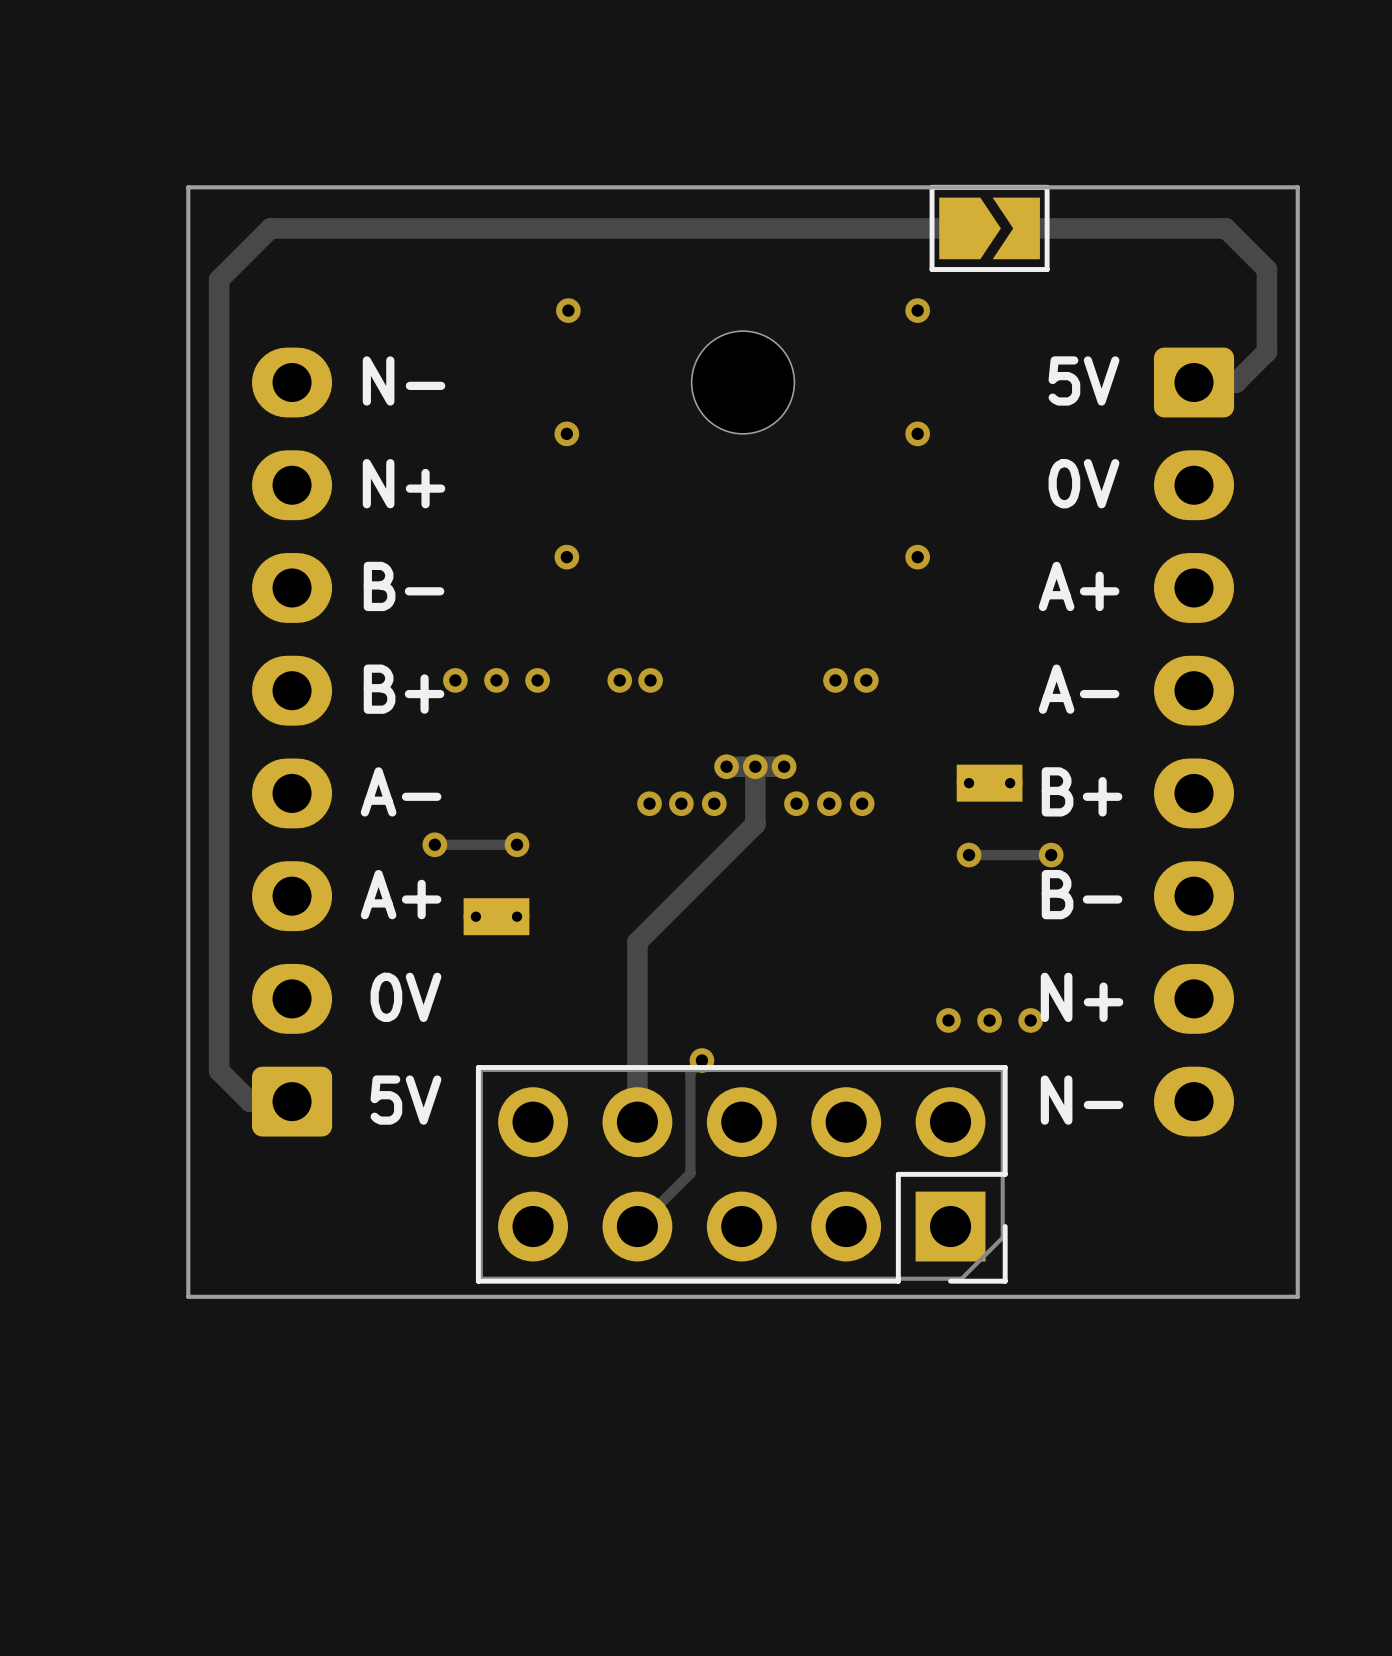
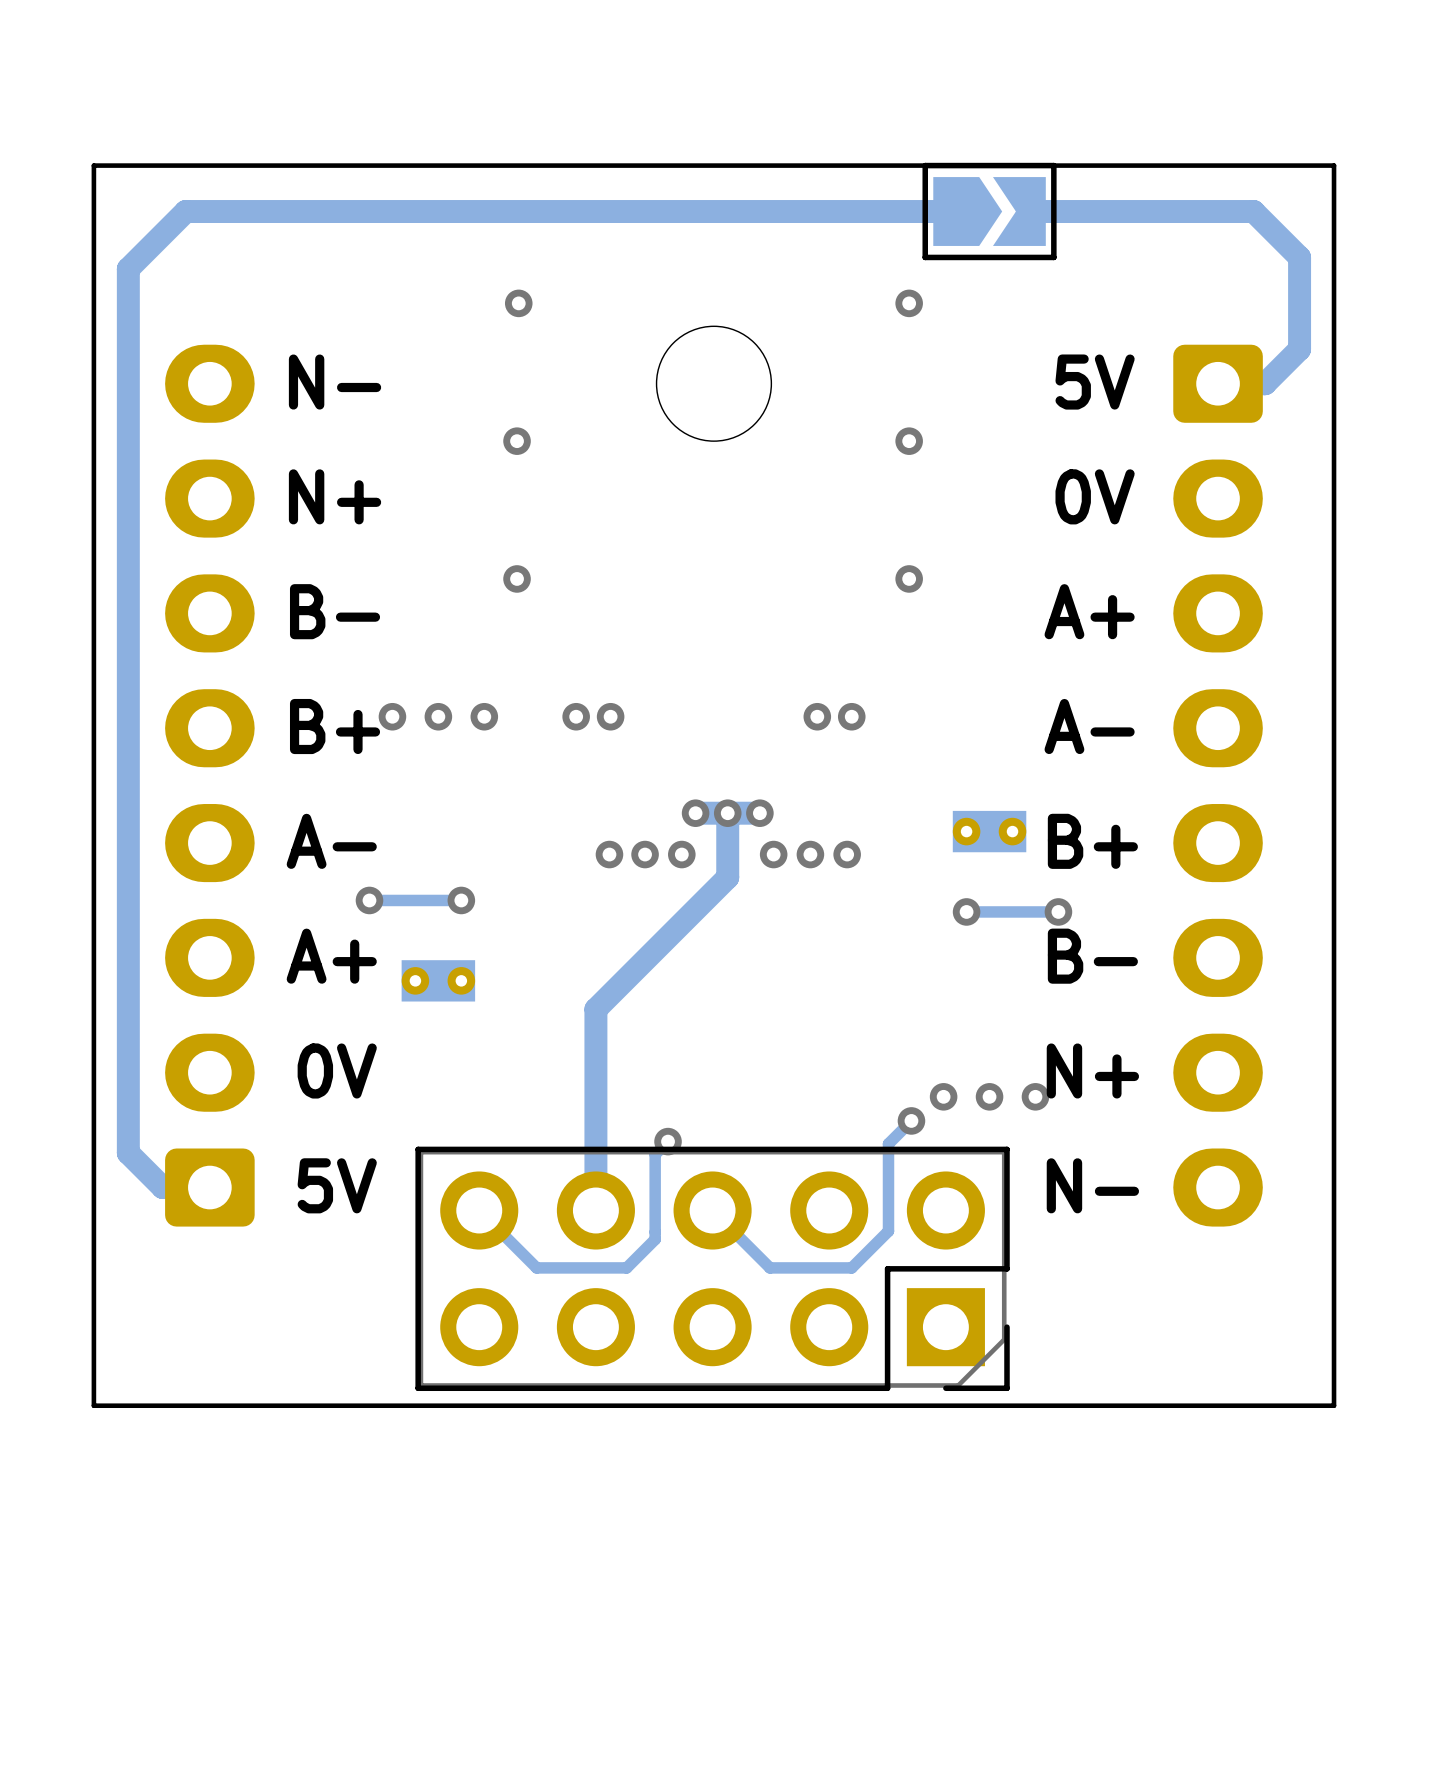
track: none -> (911, 1120) (888, 1143) (888, 1231) (851, 1267) (769, 1267) (712, 1210)
via: none -> (911, 1120)
track: (690, 1148) (690, 1173) (637, 1226) -> (655, 1239) (626, 1267) (536, 1267) (479, 1210)

